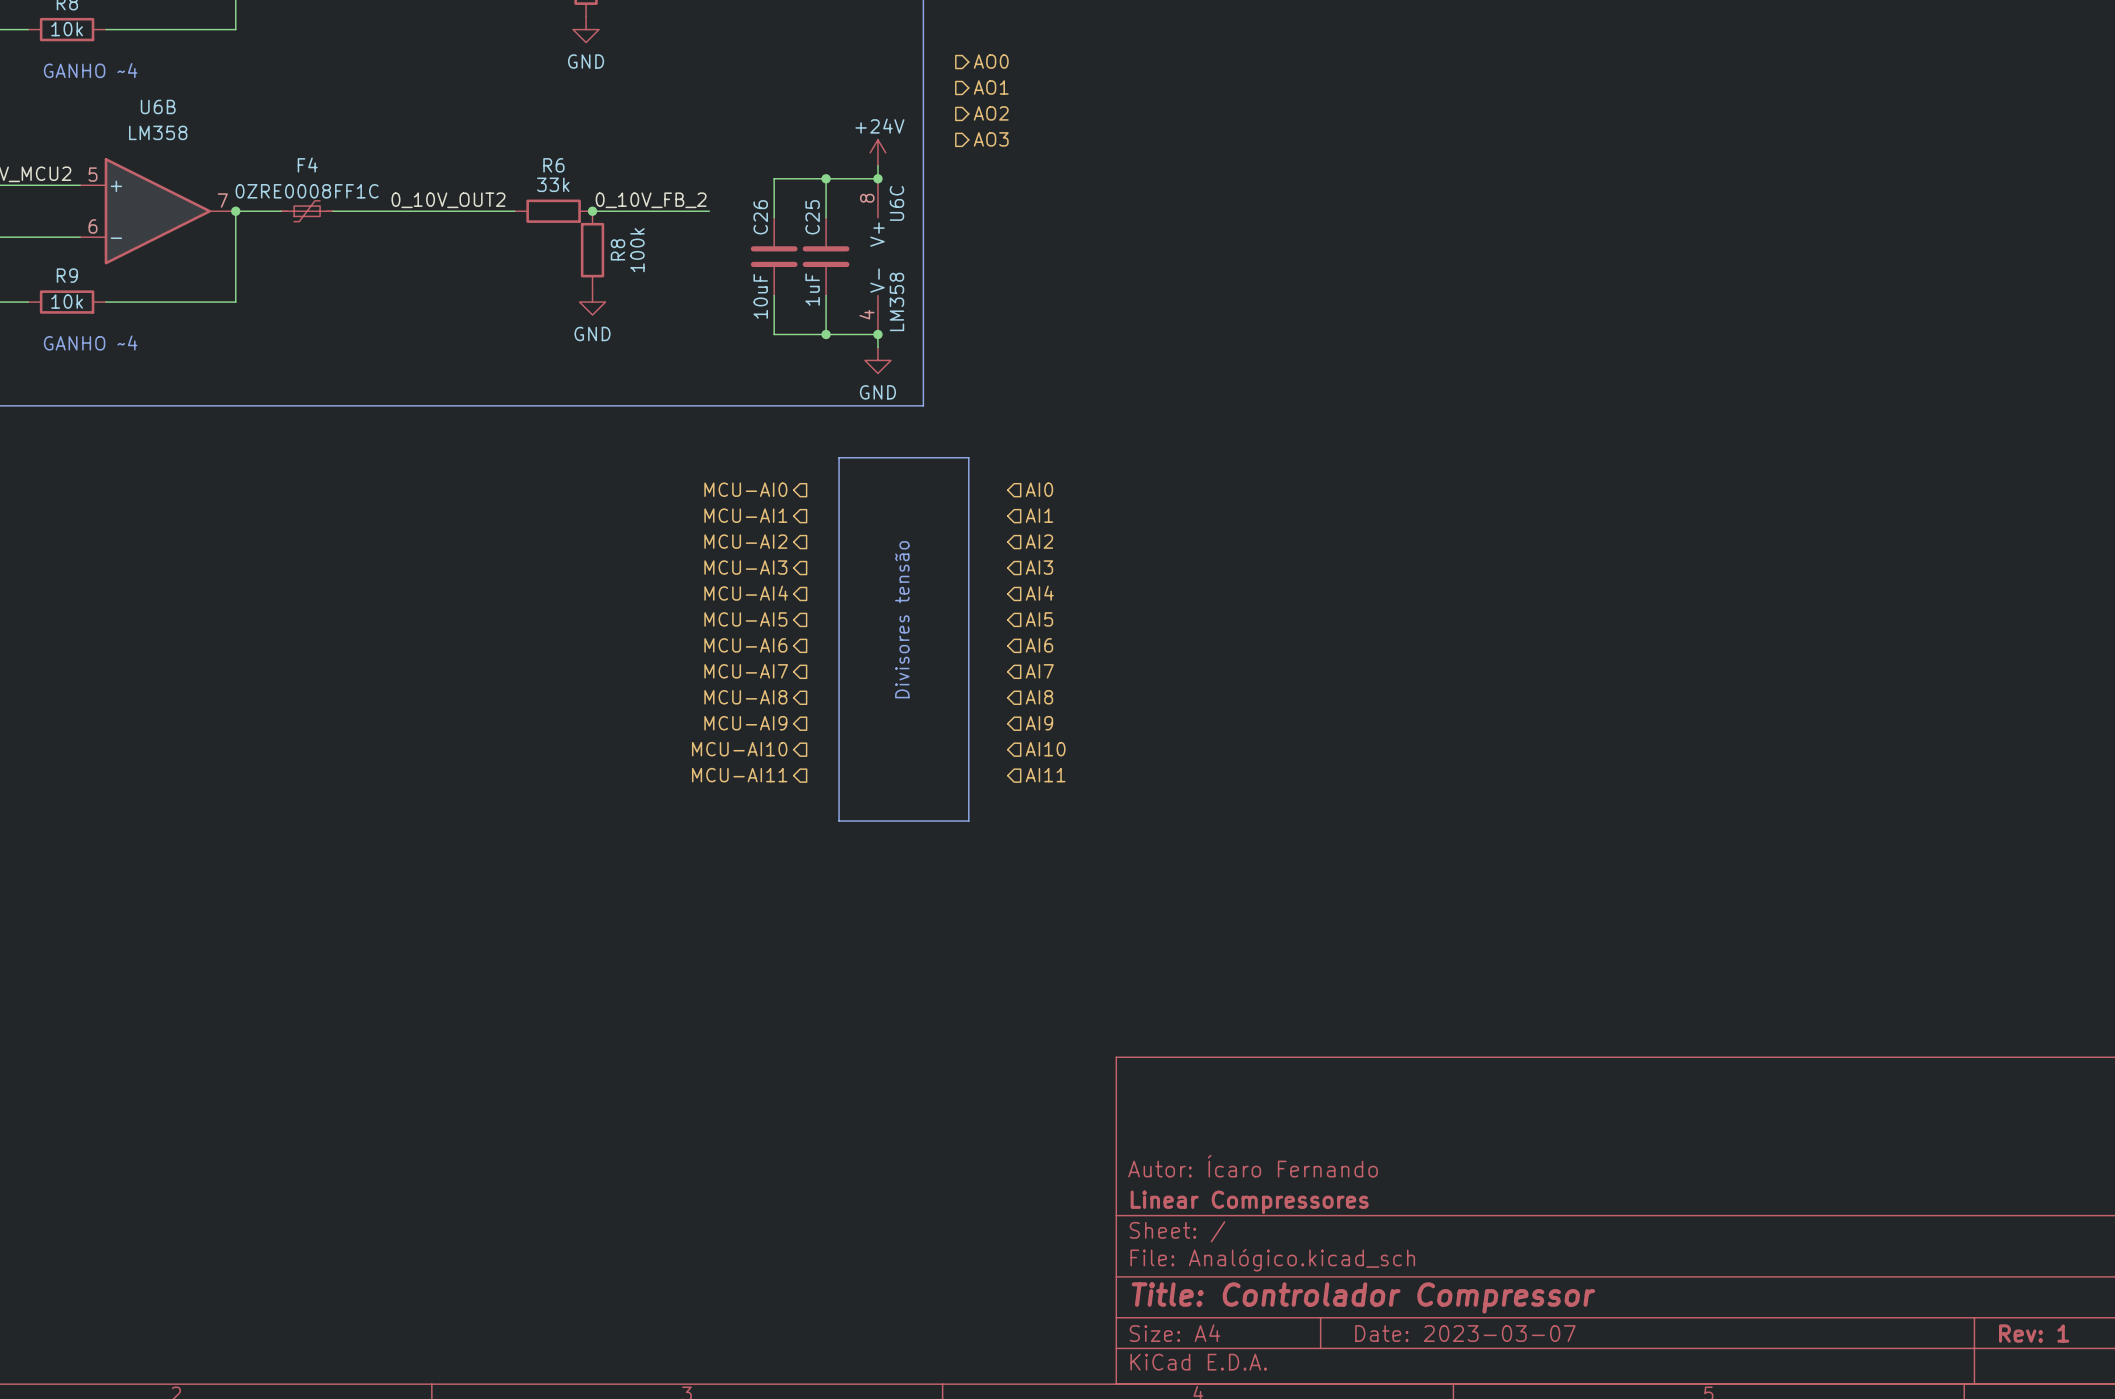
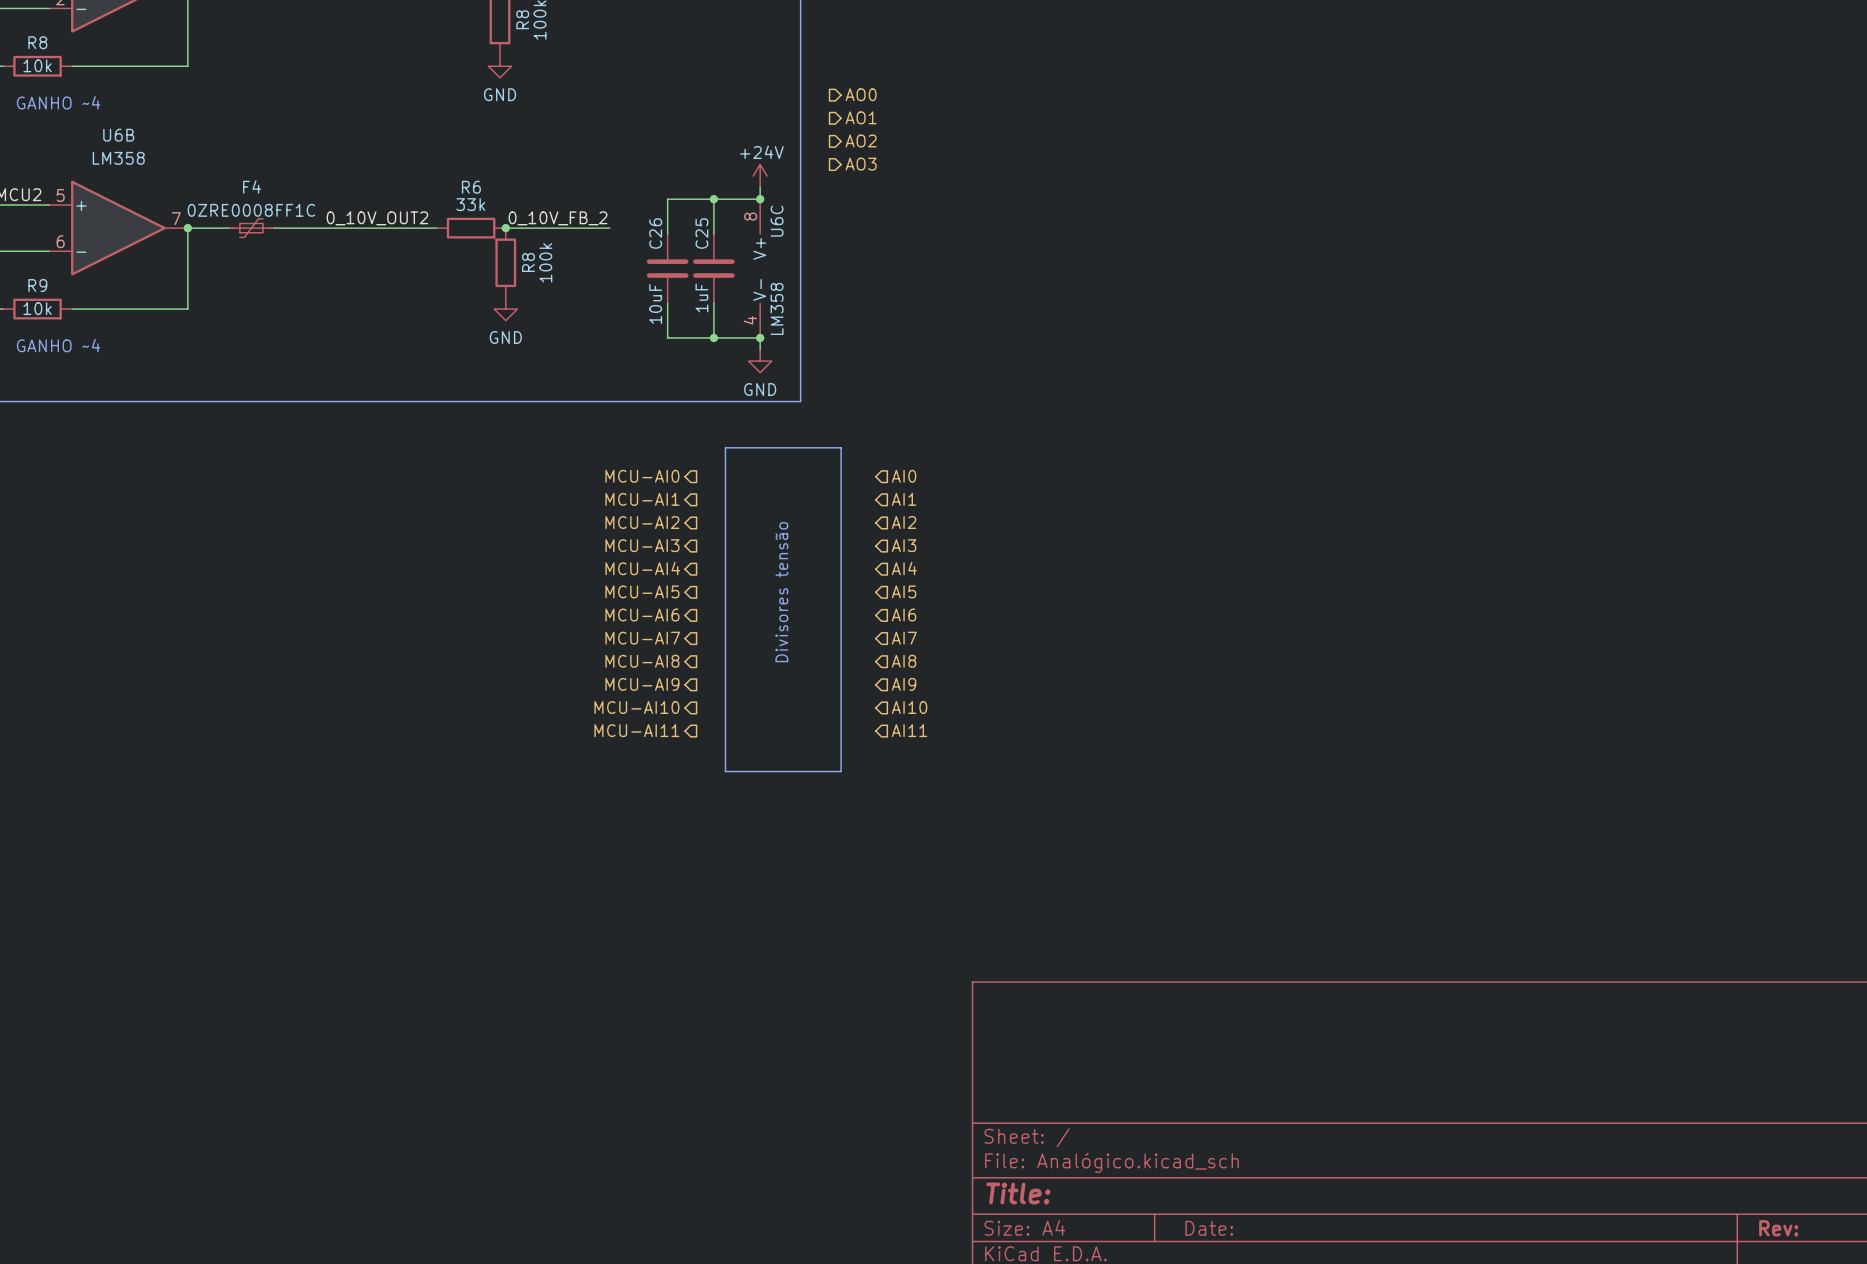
title block: Autor: Ícaro Fernando (1253, 1166) -> none
title block: Linear Compressores (1249, 1202) -> none
title block: Title: Controlador Compressor (1363, 1297) -> Title: (1018, 1193)
title block: Date: 2023-03-07 (1465, 1333) -> Date: (1209, 1228)
title block: Rev: 1 (2034, 1333) -> Rev: (1778, 1228)

